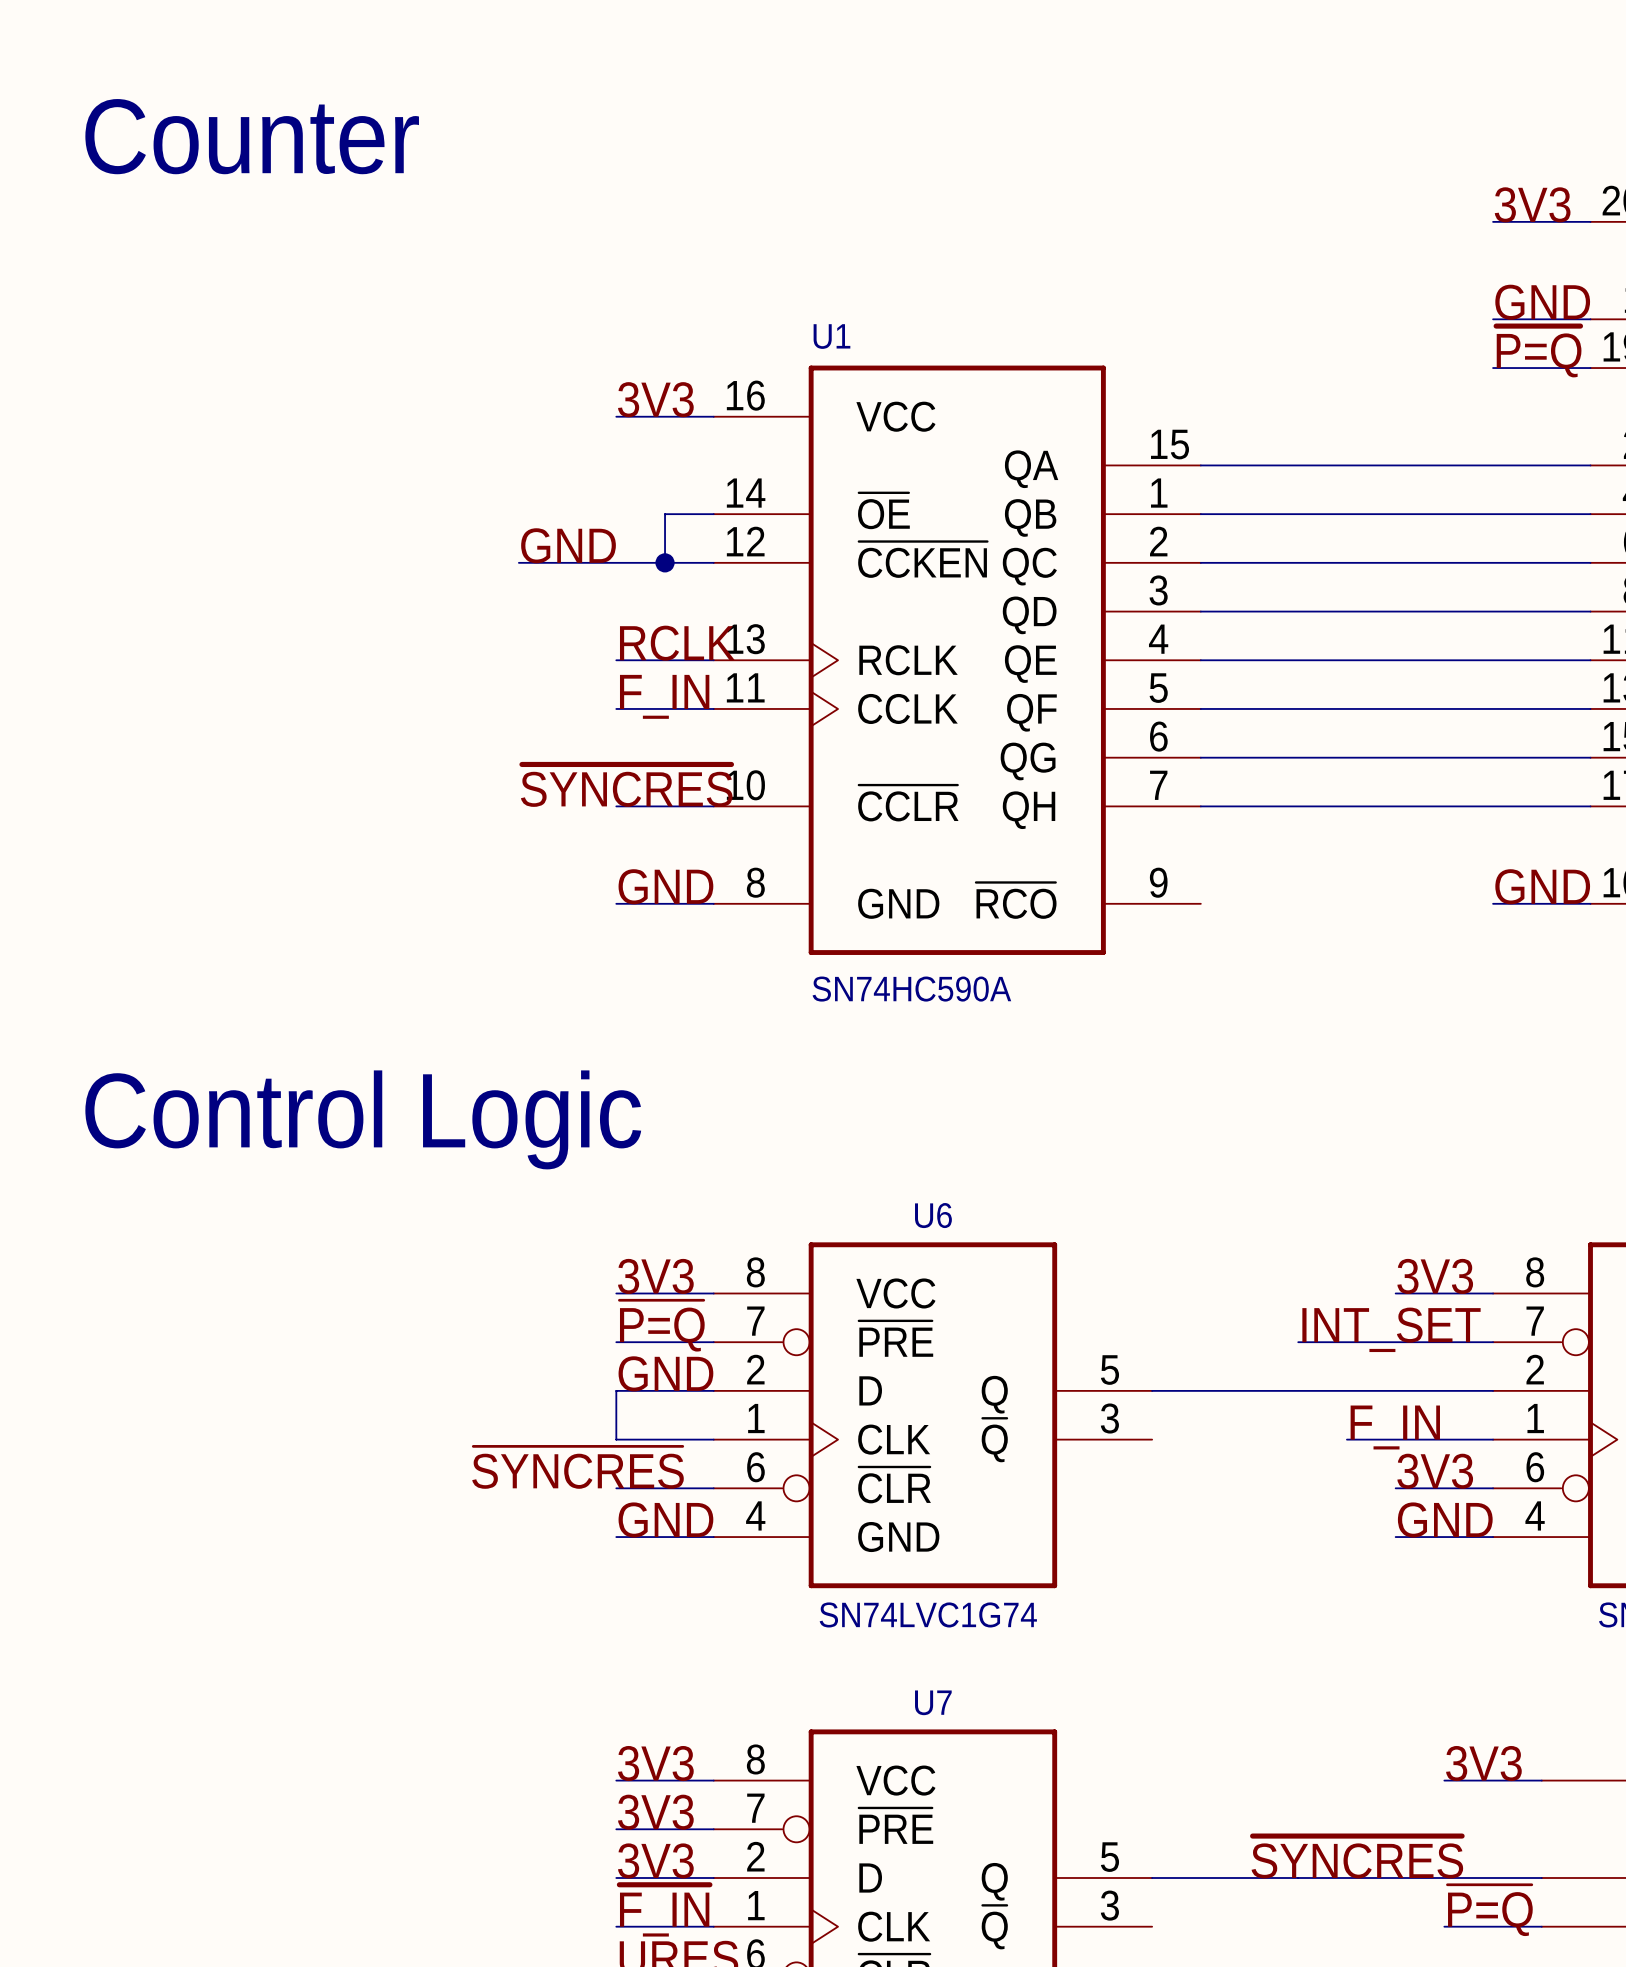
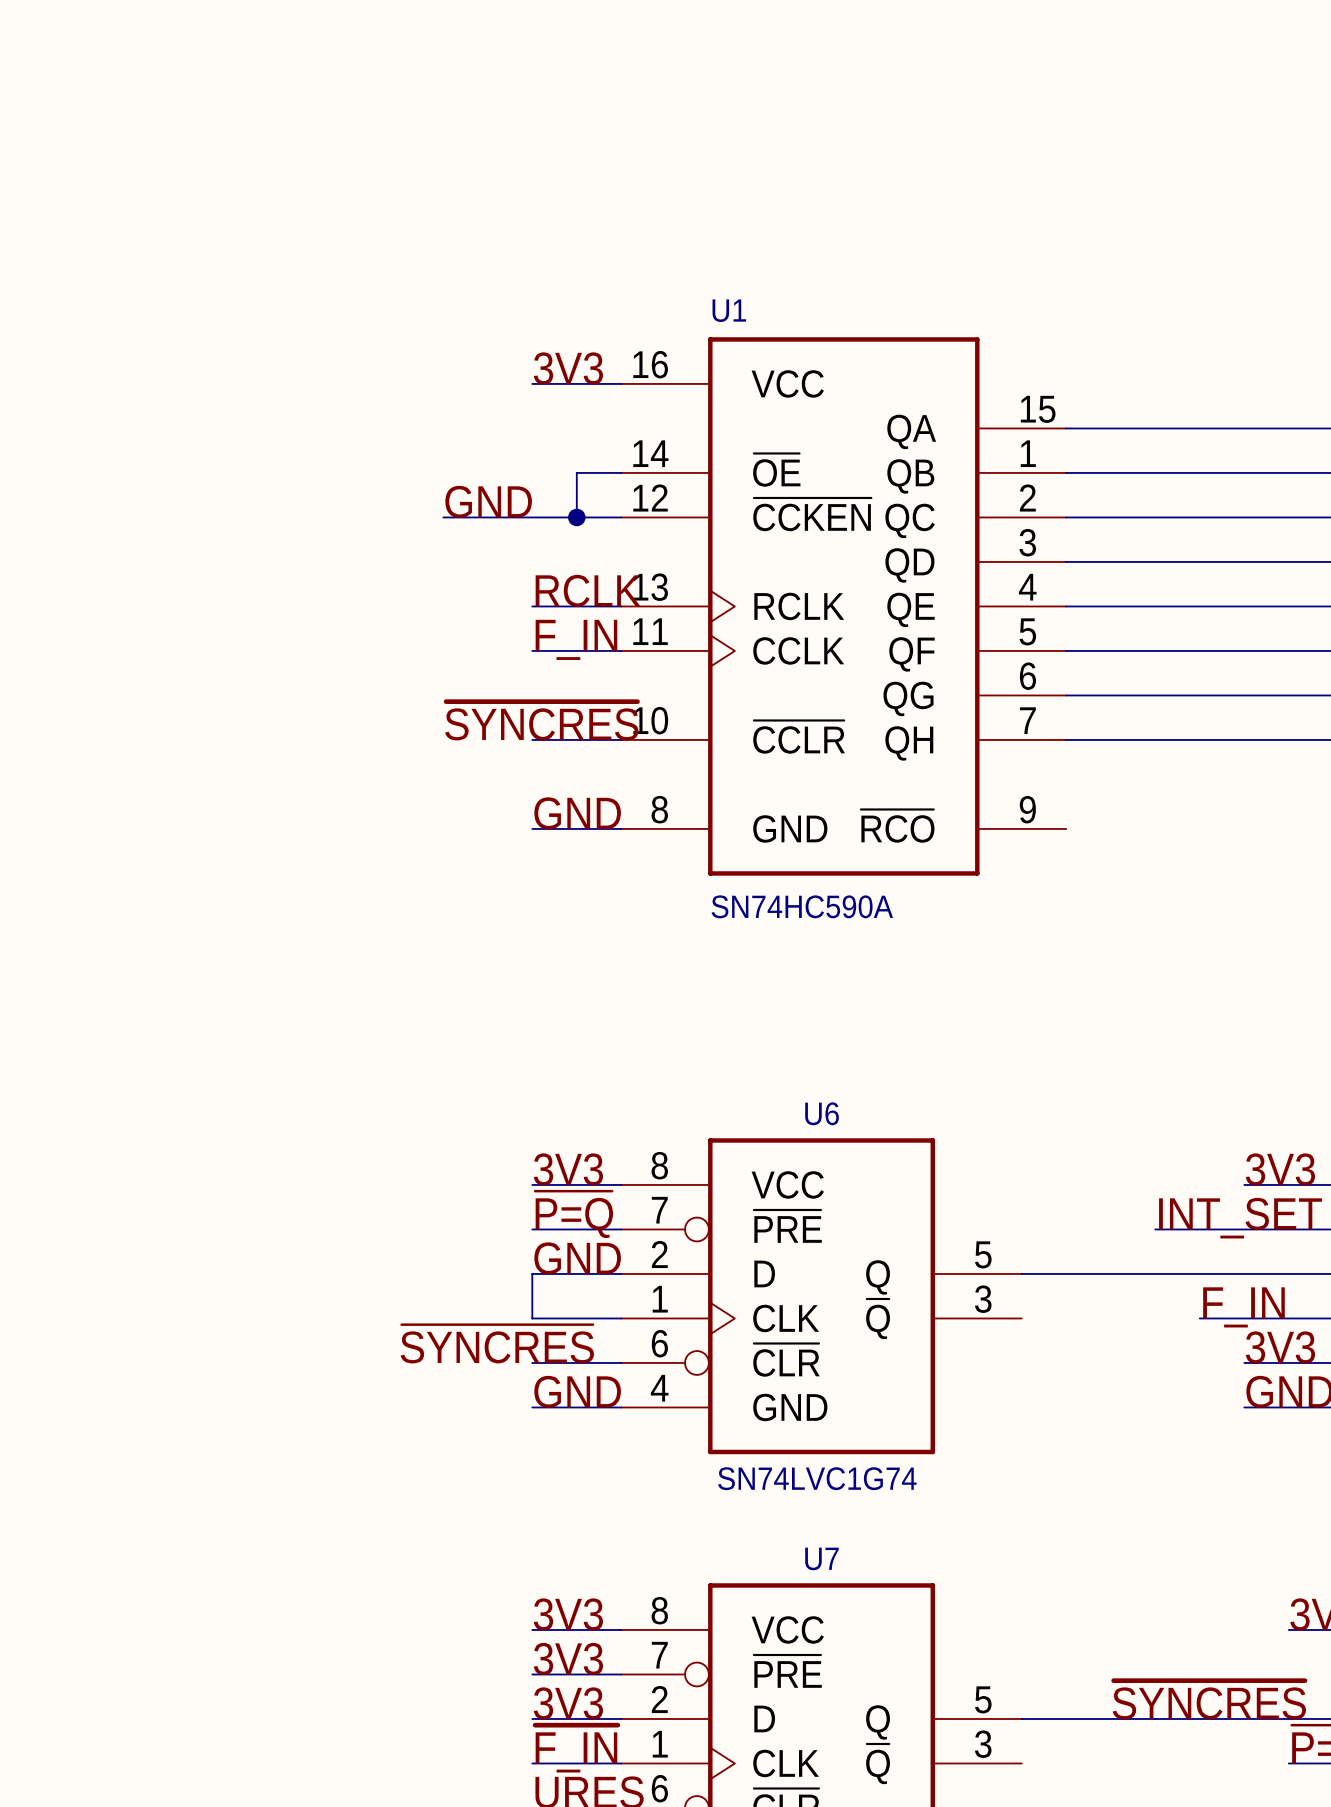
text: Counter (252, 136) -> none
text: Control Logic (363, 1119) -> none

